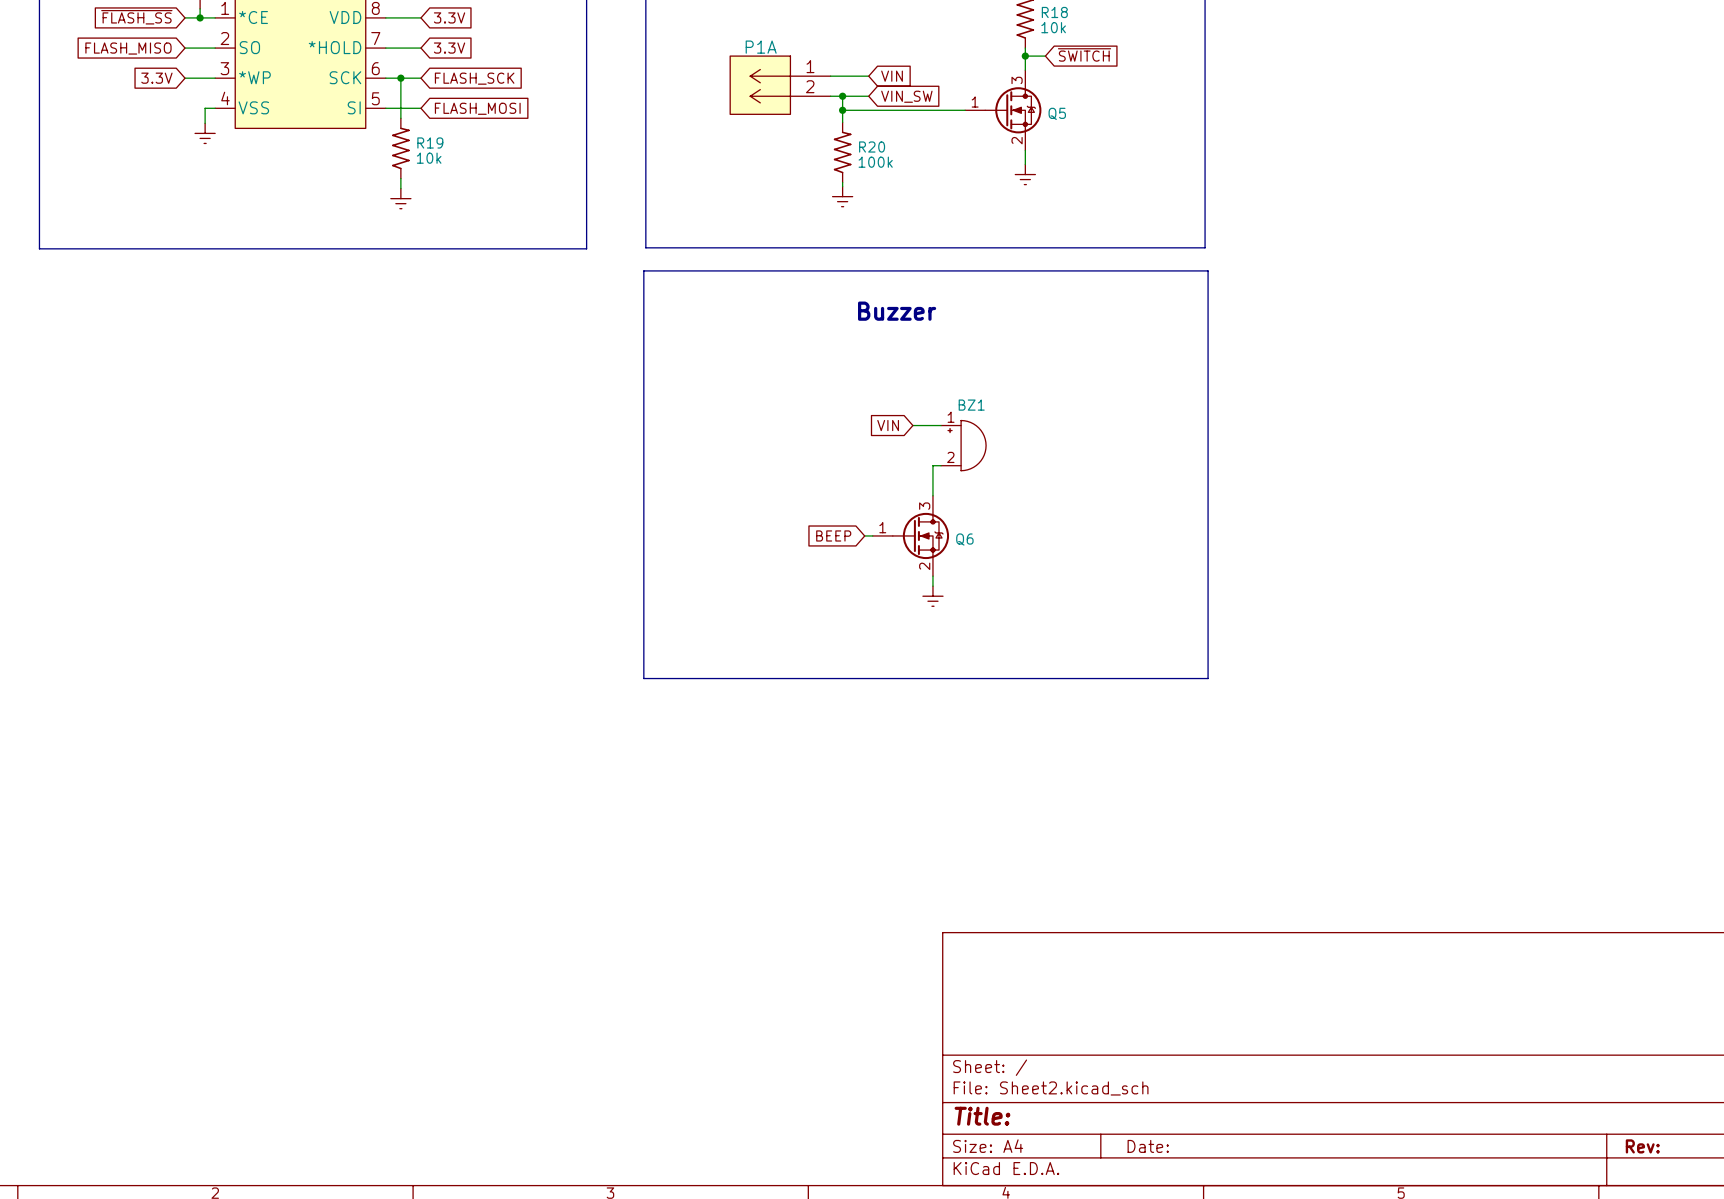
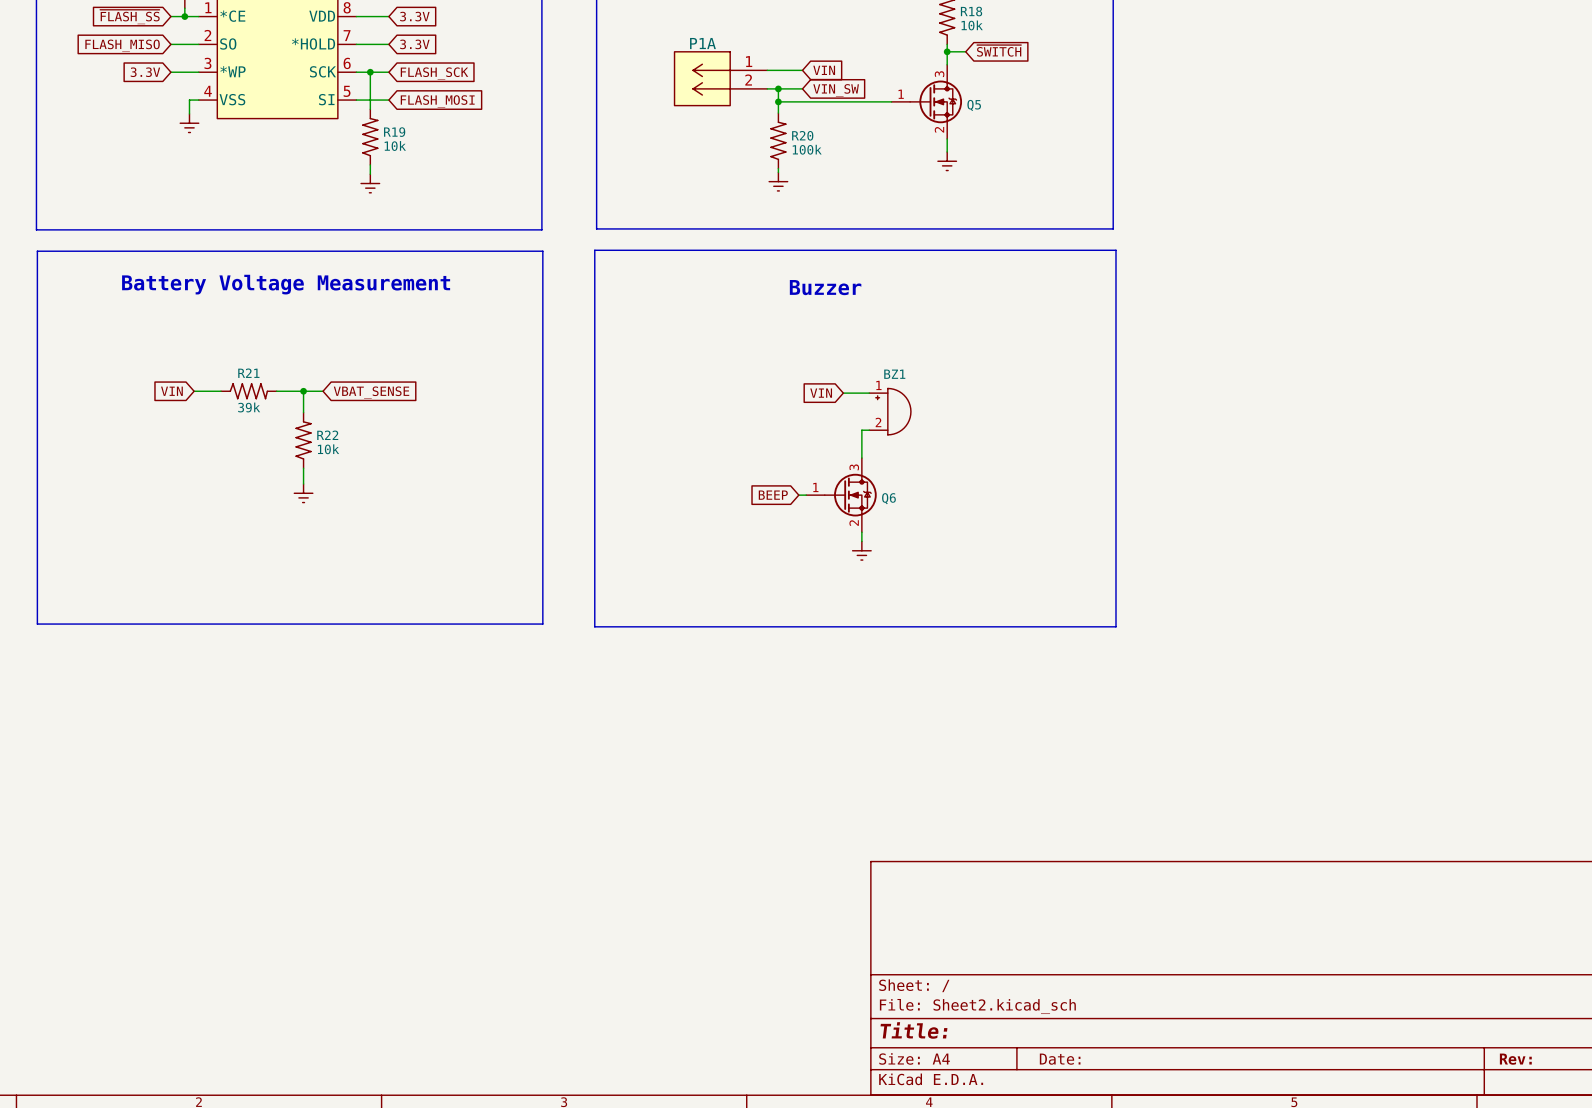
line: none -> (37, 251) (542, 251) (542, 624) (37, 624) (37, 251)
text: none -> Battery Voltage Measurement (286, 284)
global label: none -> VIN (171, 391)
wire: none -> (194, 391) (221, 391)
R21: none -> 39k (248, 391)
wire: none -> (276, 391) (323, 391)
wire: none -> (303, 391) (303, 412)
junction: none -> (303, 391)
global label: none -> VBAT_SENSE (371, 392)
R22: none -> 10k (303, 440)
wire: none -> (303, 468) (303, 484)
power symbol: none -> (303, 493)

